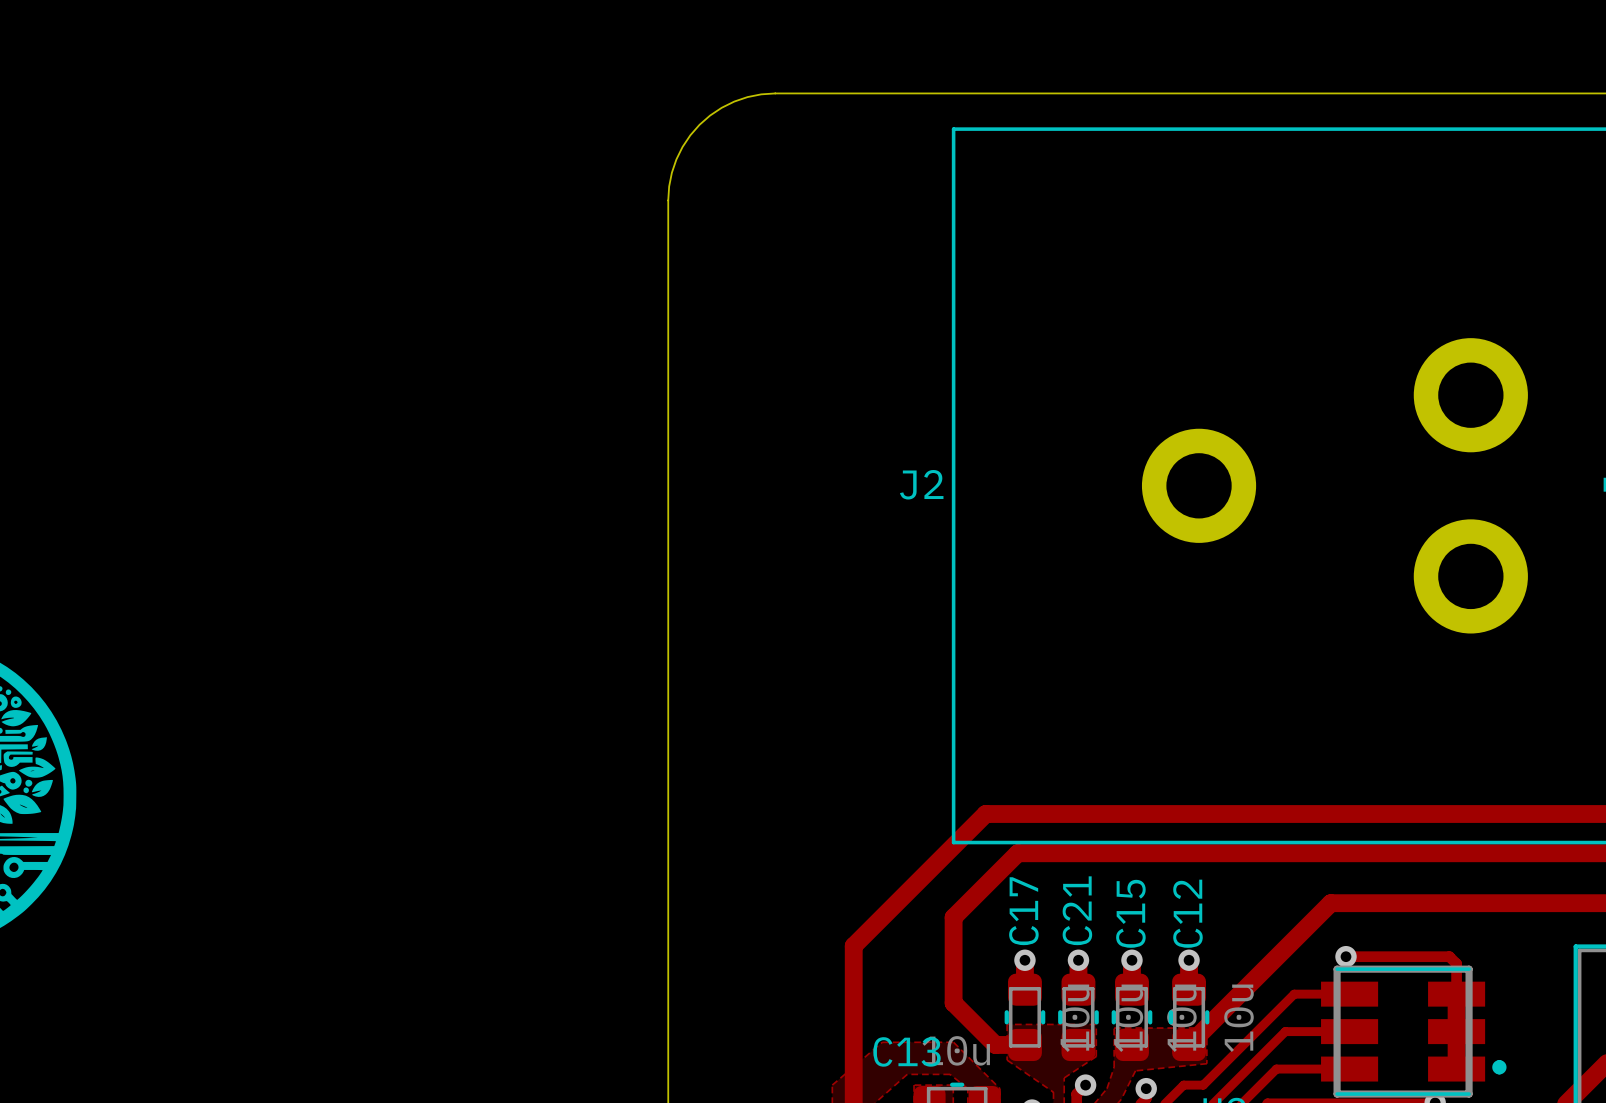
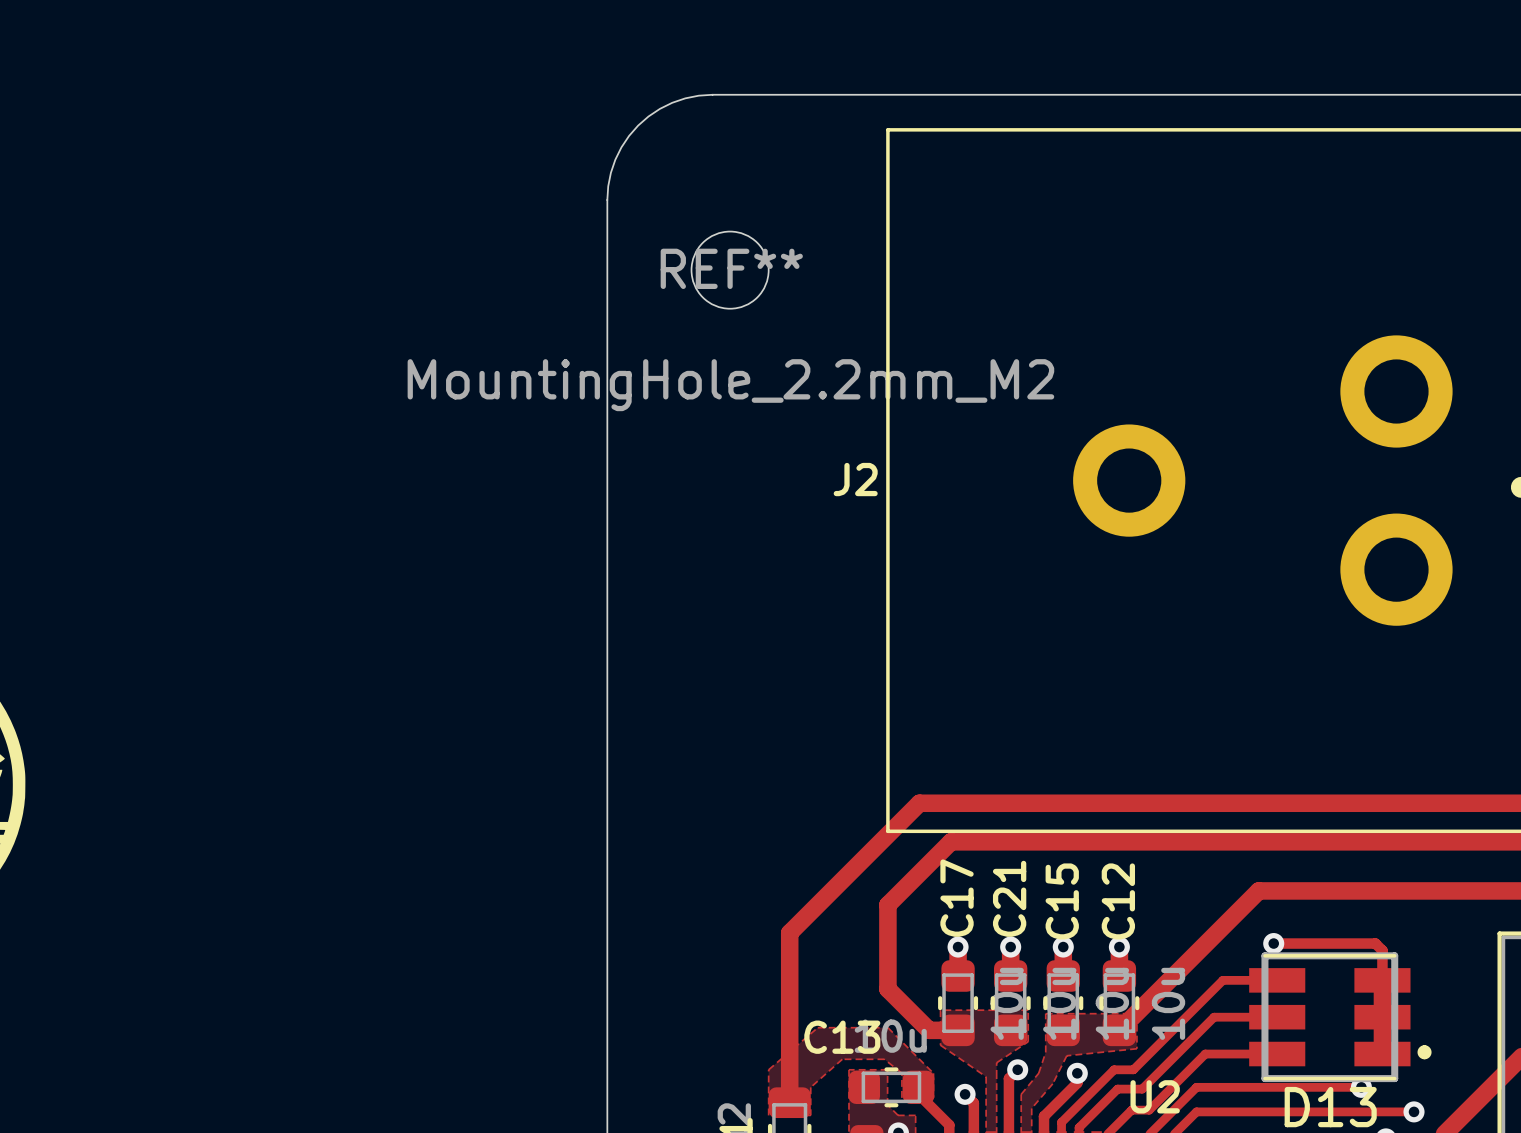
REF**: none -> MountingHole_2.2mm_M2 (730, 270)

